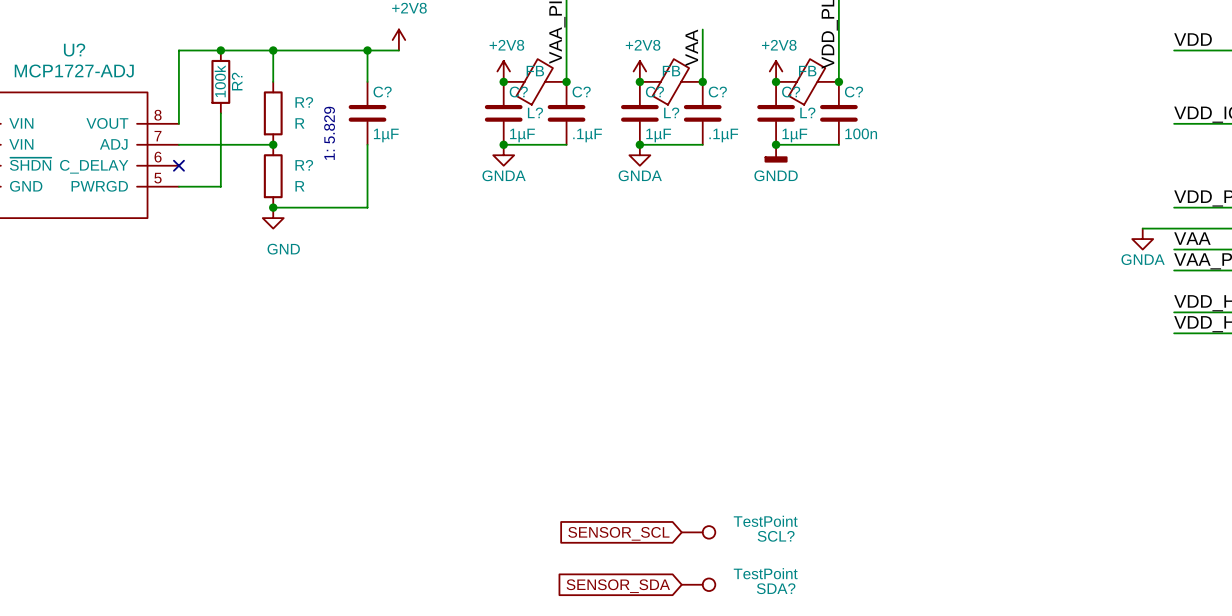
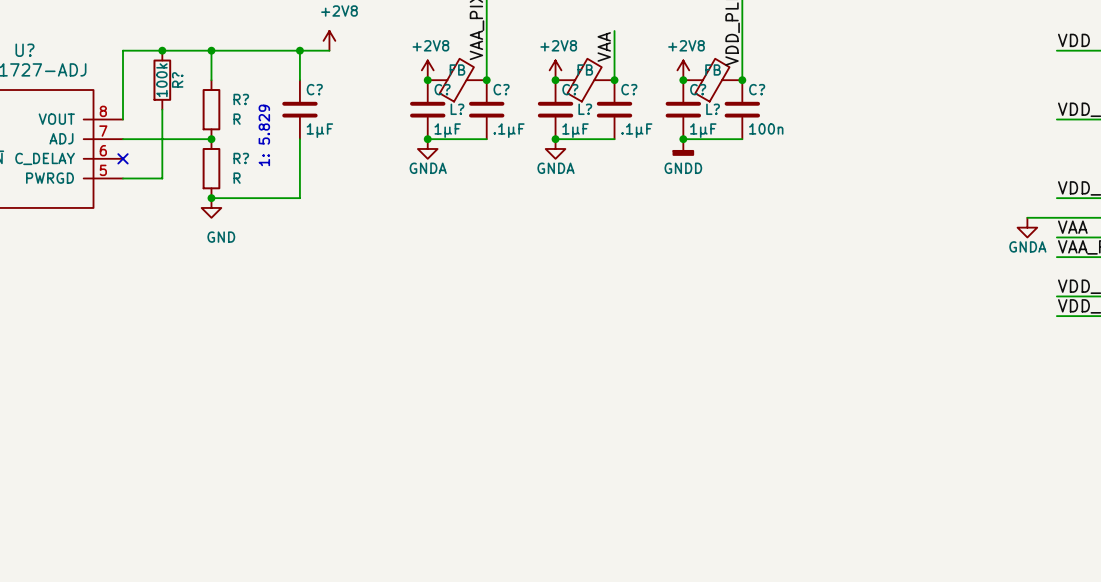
SCL?: TestPoint (698, 532) -> none
global label: SENSOR_SCL (618, 533) -> none
SDA?: TestPoint (698, 584) -> none
global label: SENSOR_SDA (618, 586) -> none

